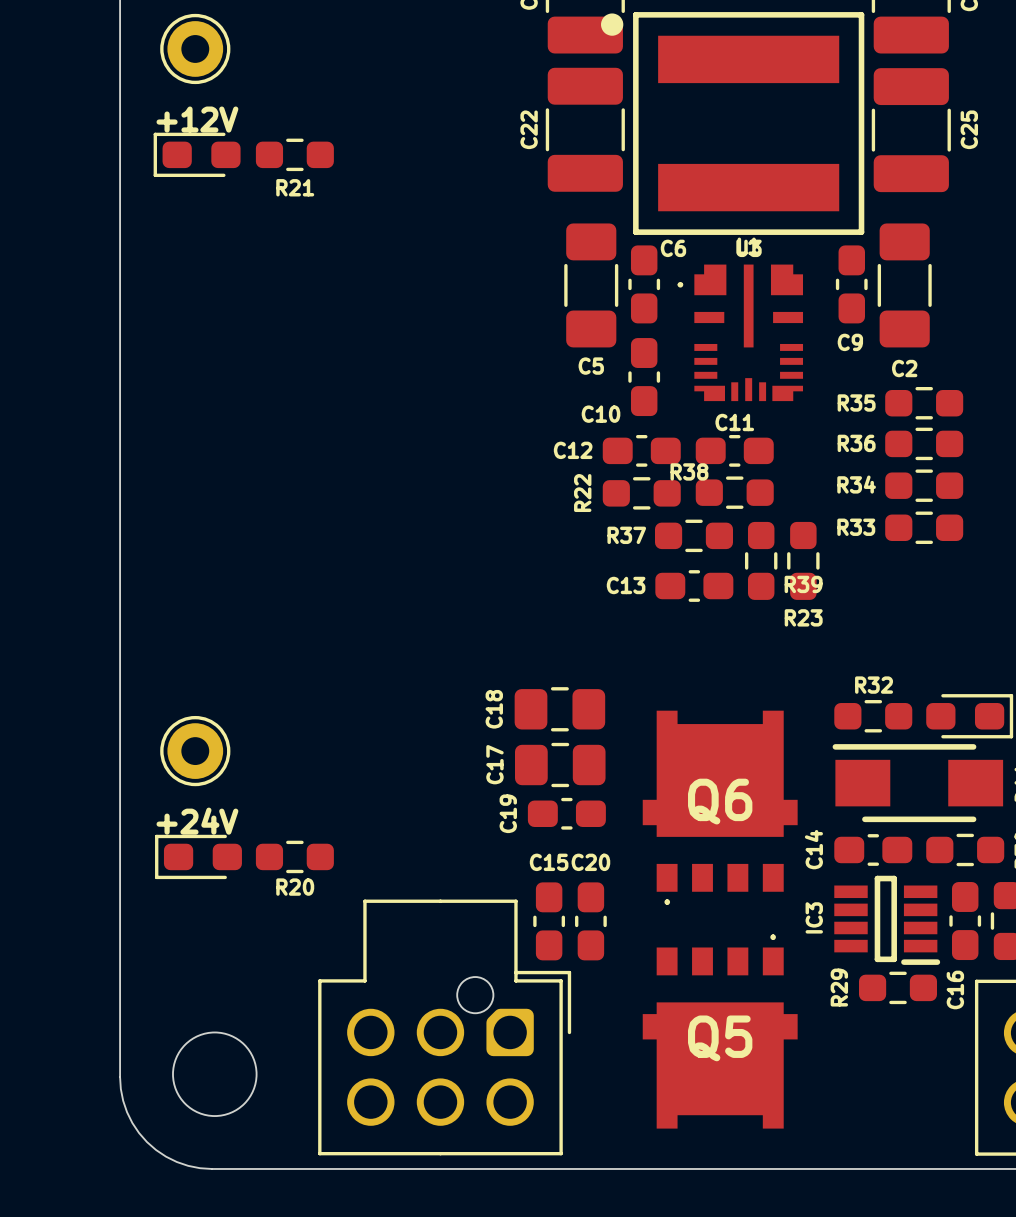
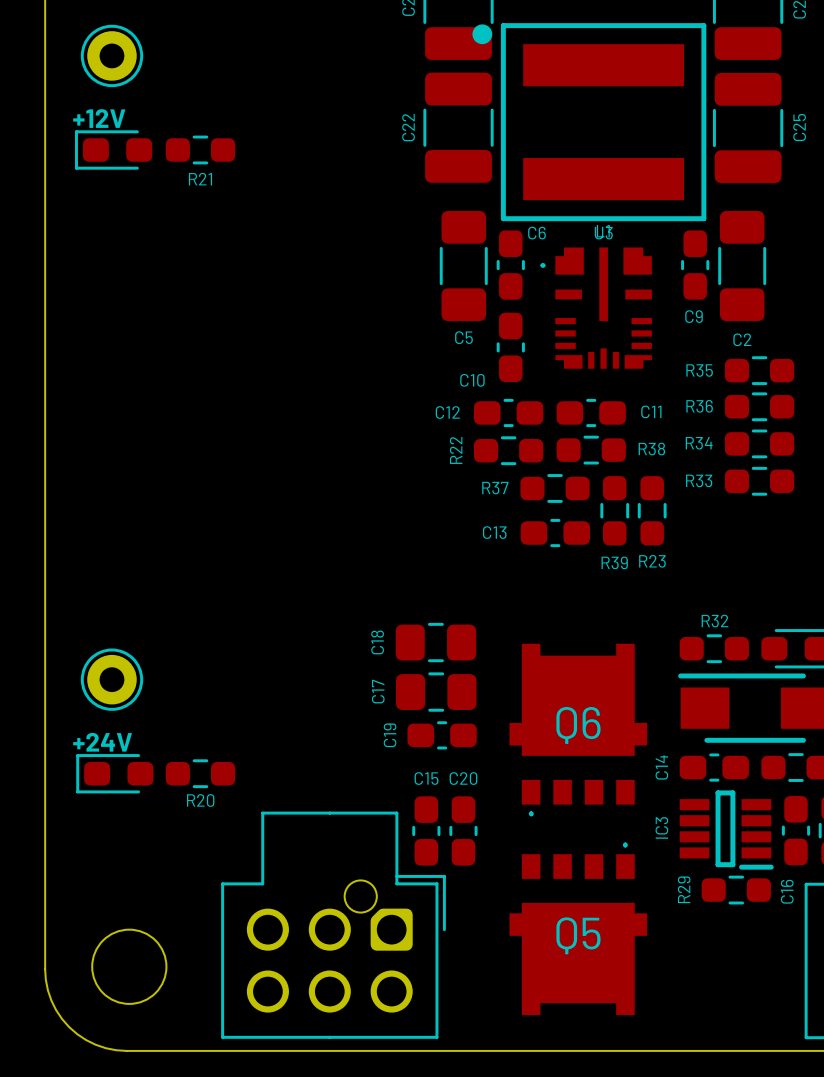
C11 name position: C11 (734, 422) -> C11 (651, 411)
R38 name position: R38 (689, 471) -> R38 (651, 449)
R39 name position: R39 (803, 584) -> R39 (614, 562)

